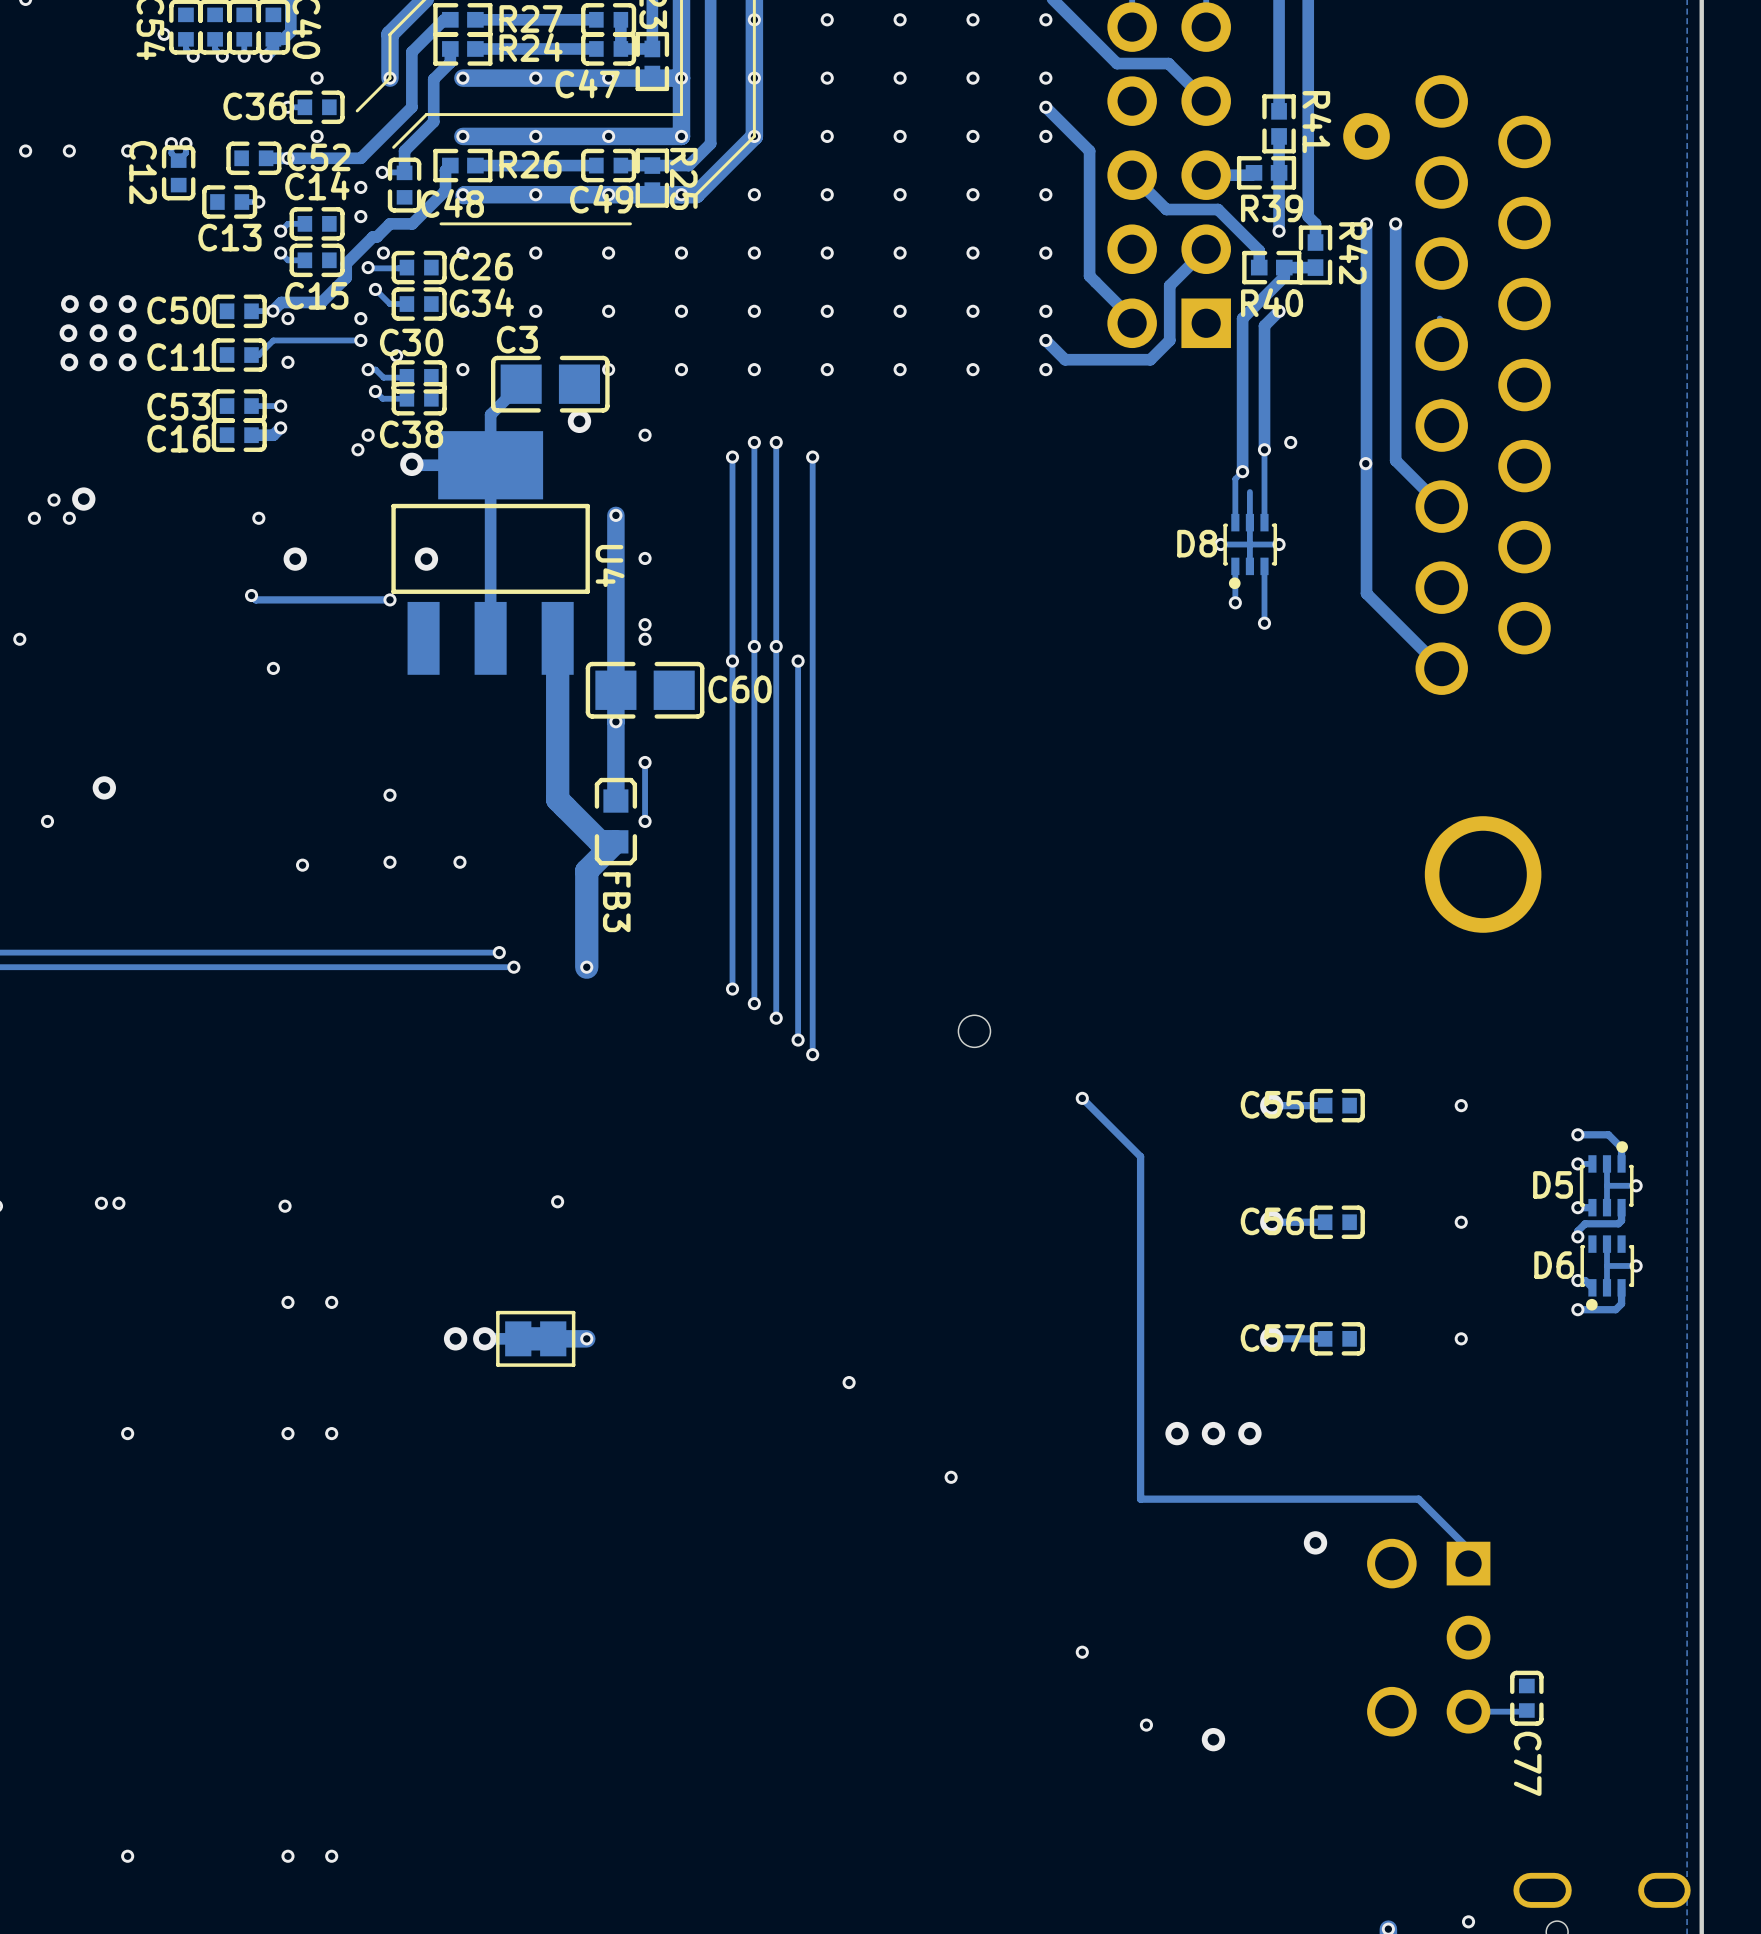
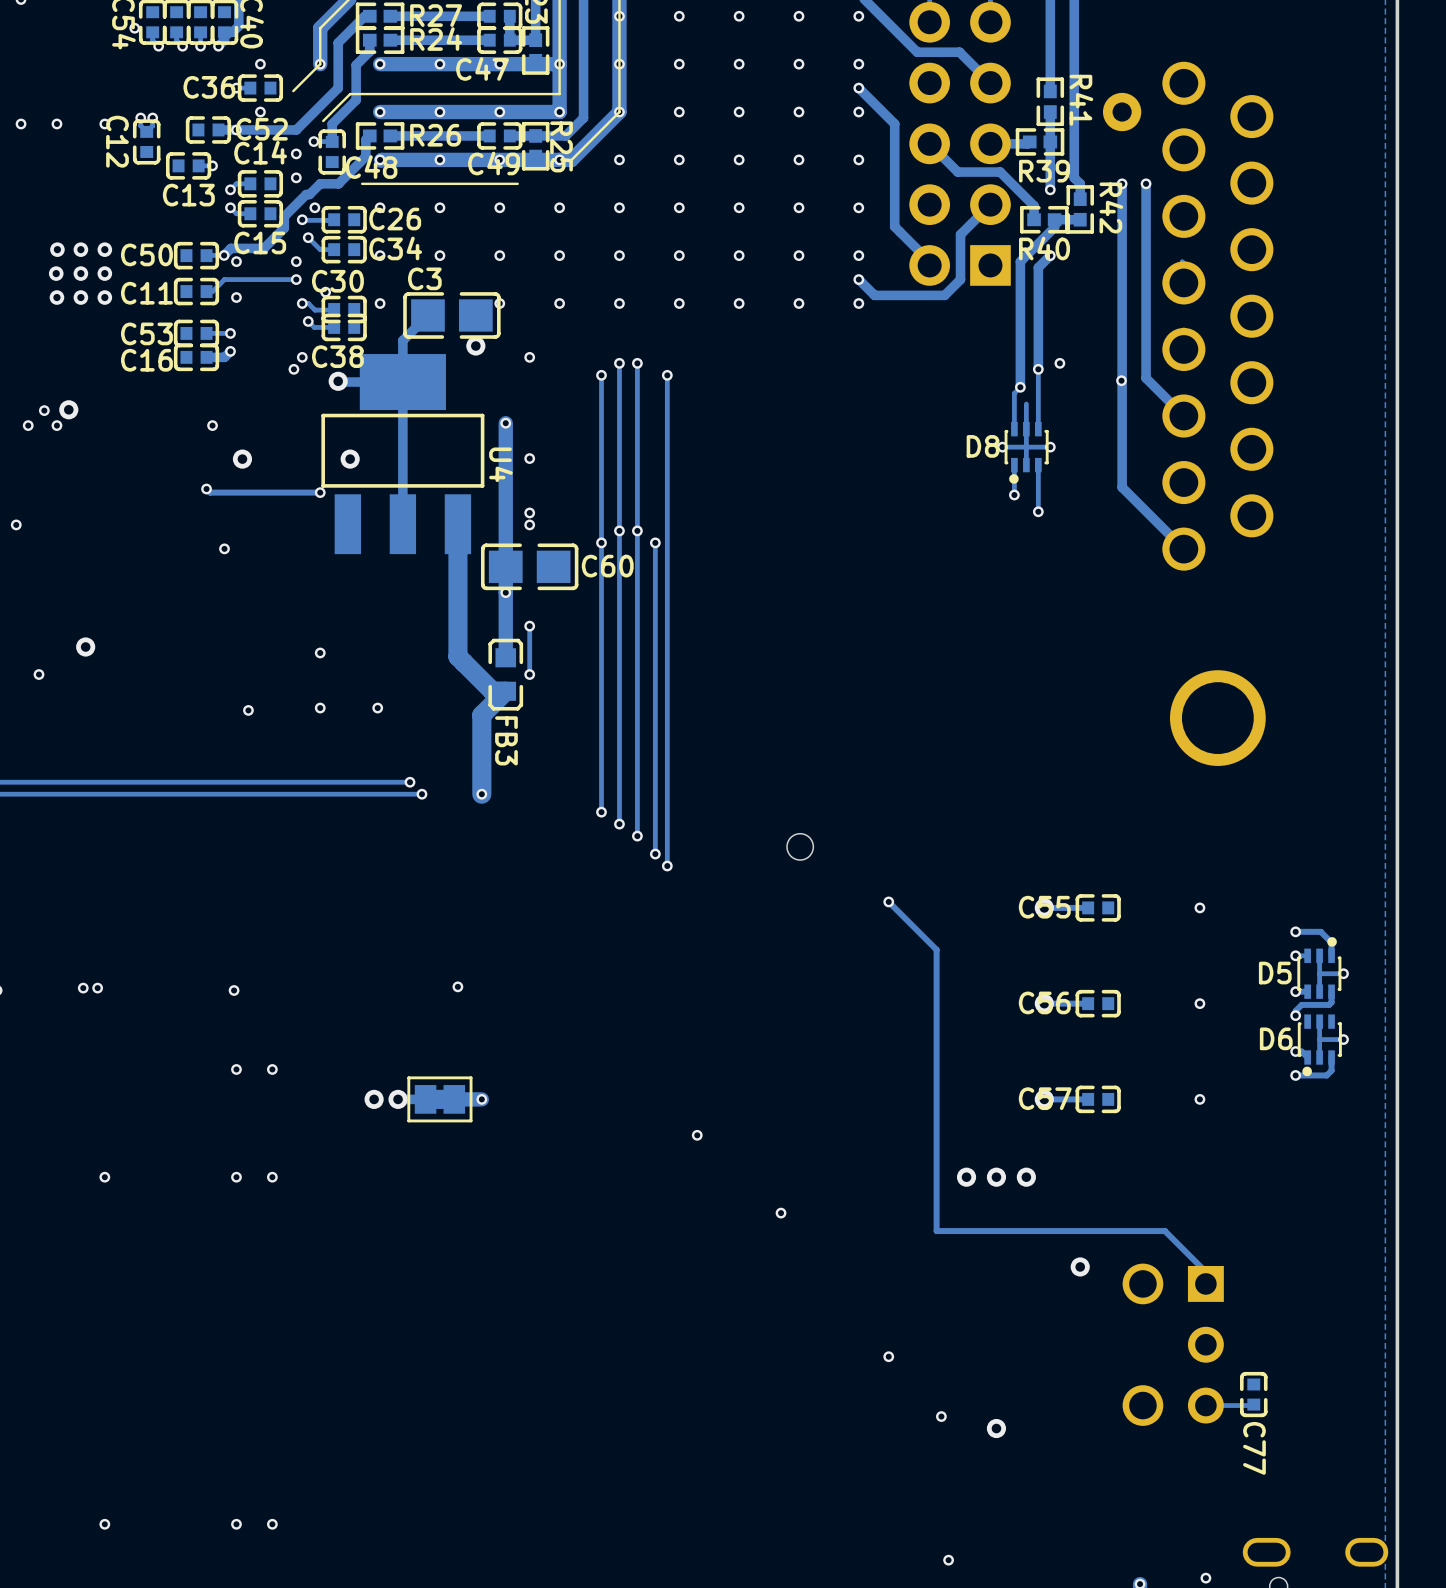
via: none -> (948, 1560)

